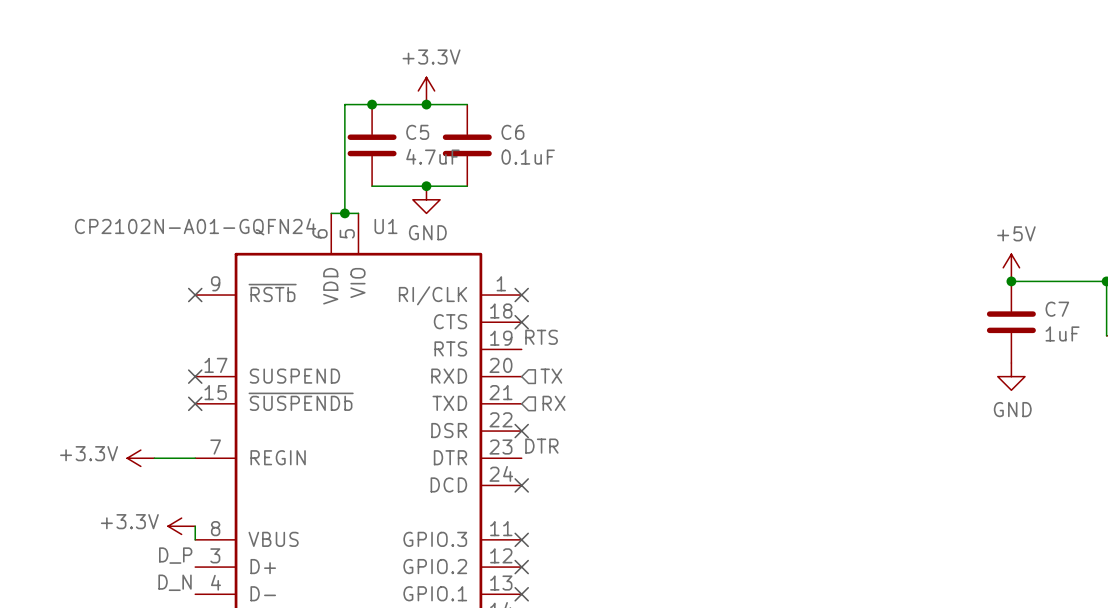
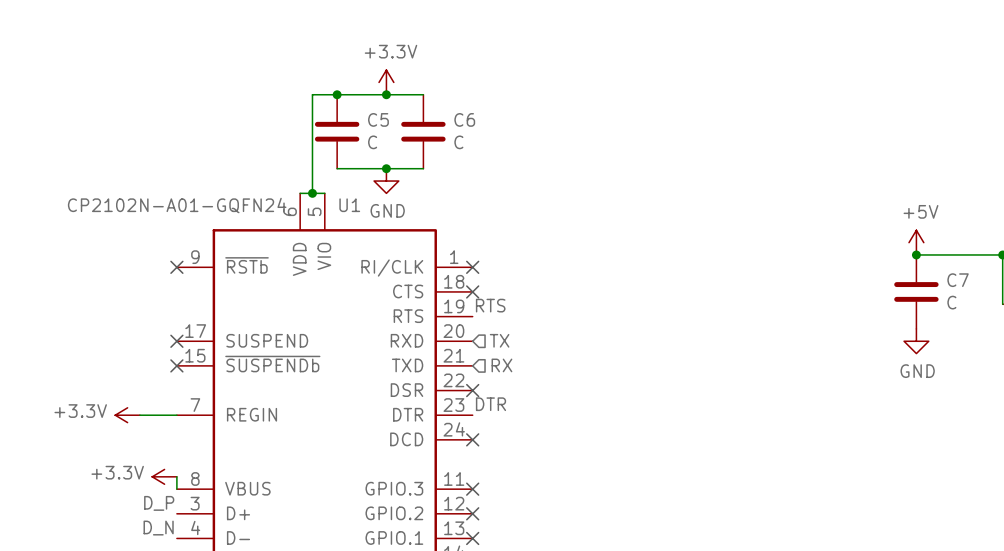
C5 value: 4.7uF (432, 156) -> C (372, 142)
C6 value: 0.1uF (528, 157) -> C (458, 142)
C7 value: 1uF (1062, 333) -> C (951, 302)

